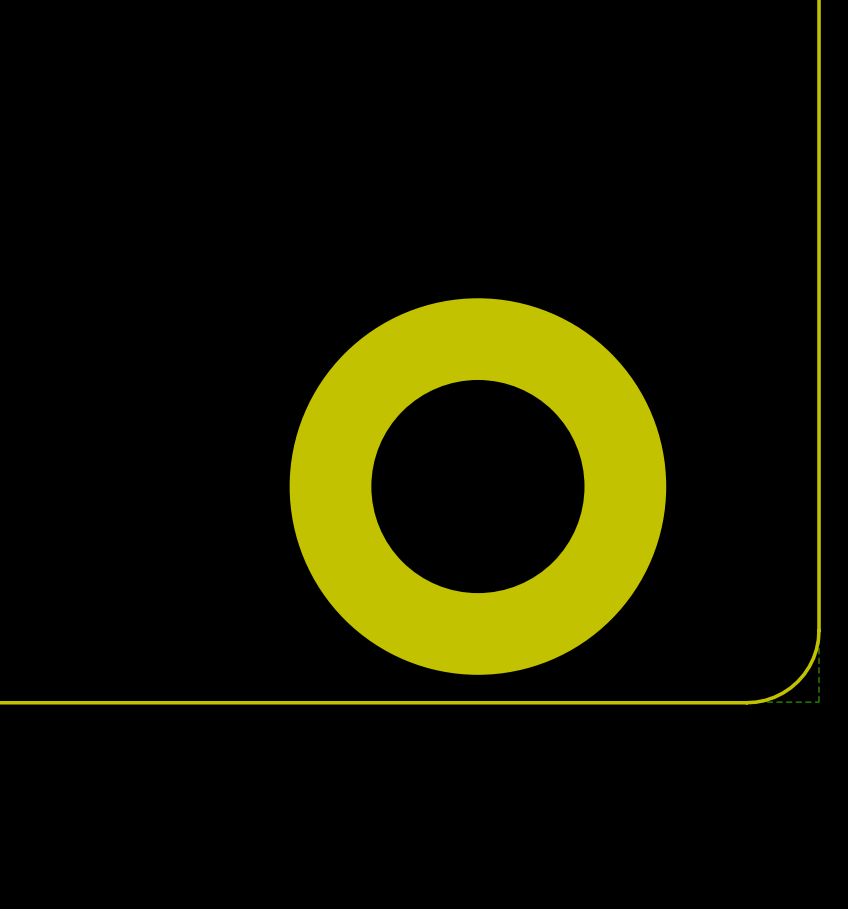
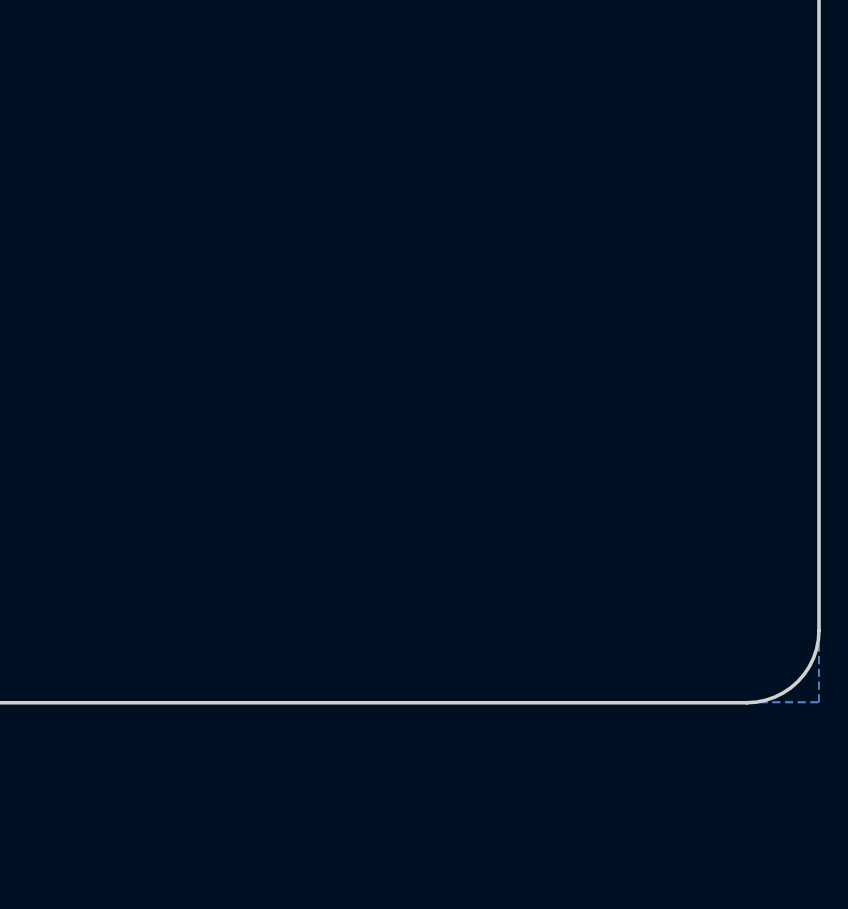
part: (477, 486) -> none

